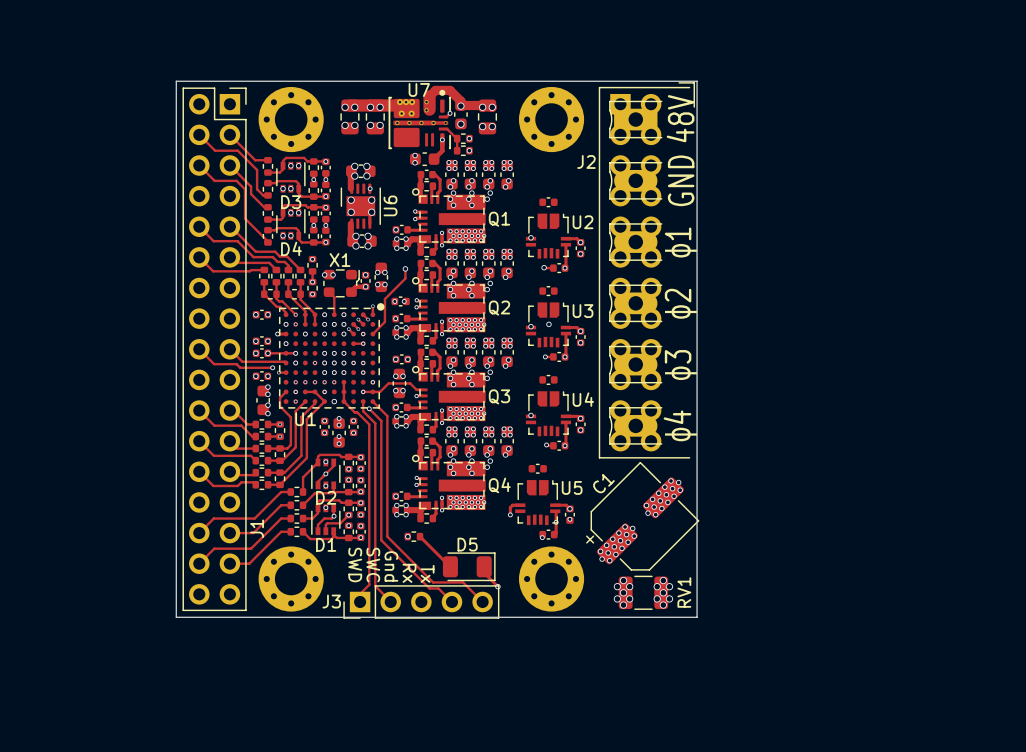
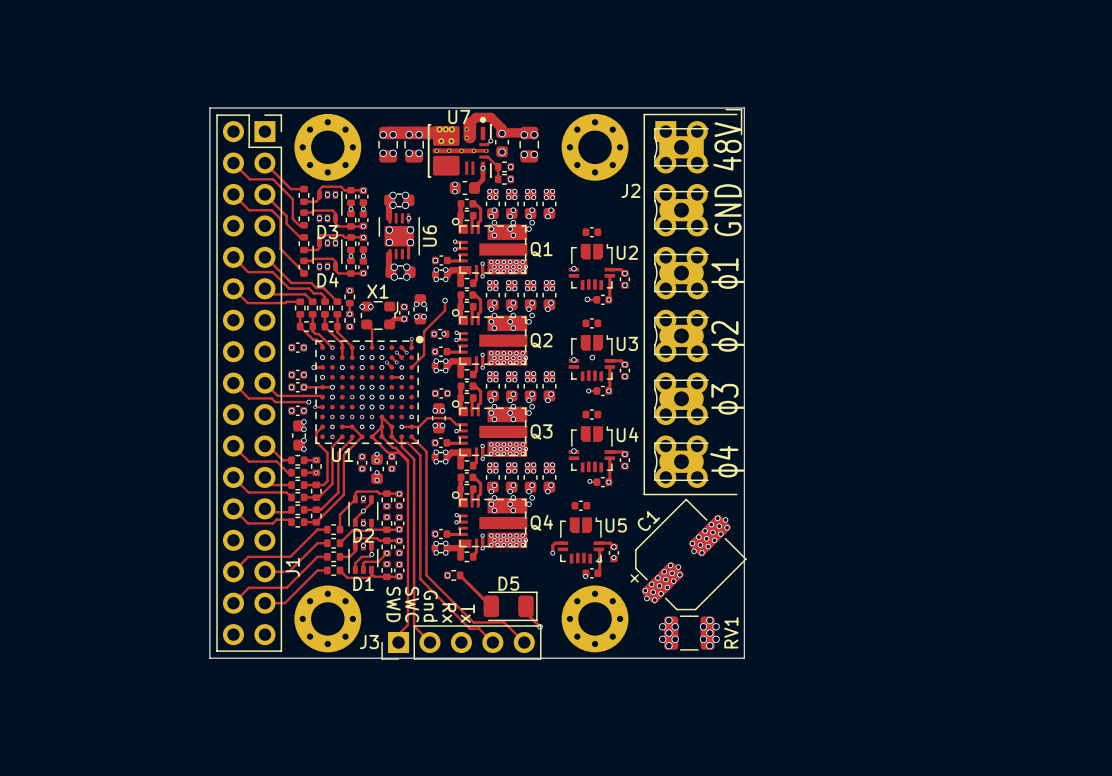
via: (363, 372) -> none
track: none -> (381, 426) (372, 436) (388, 452) (399, 452) (407, 461)
via: (334, 401) -> none
track: (369, 408) (381, 420) -> (381, 416) (391, 426) (391, 436) (398, 442) (407, 442) (420, 456)
via position: (369, 408) -> (372, 426)

